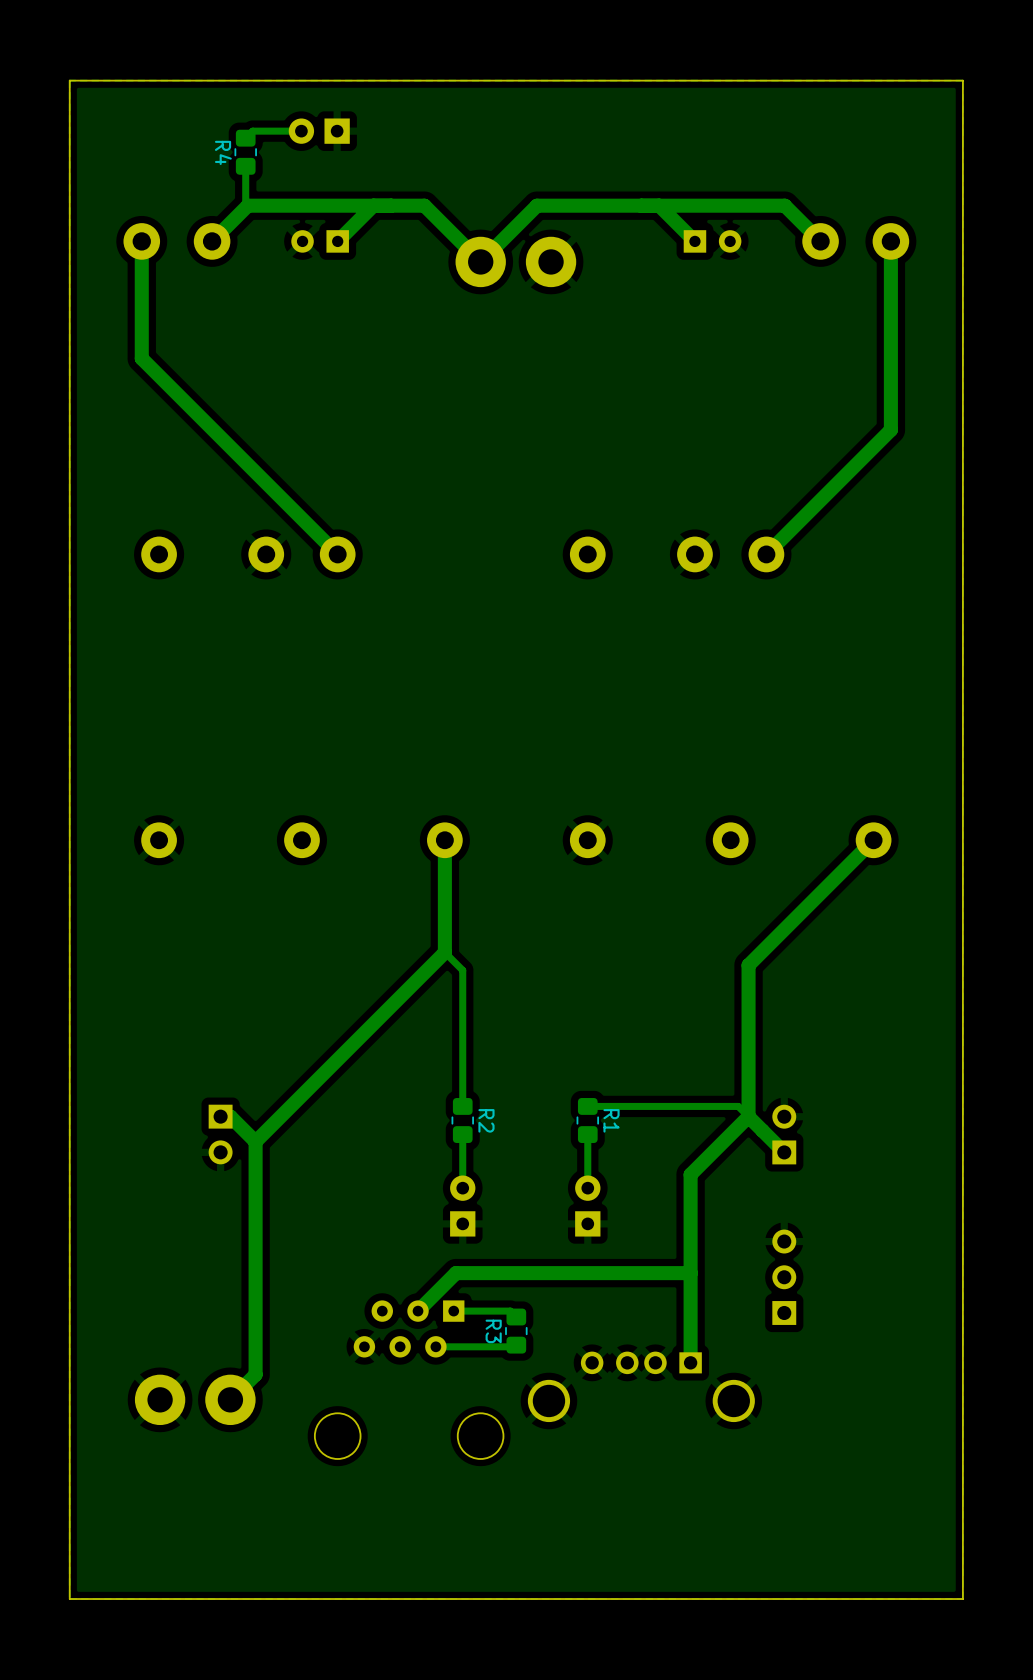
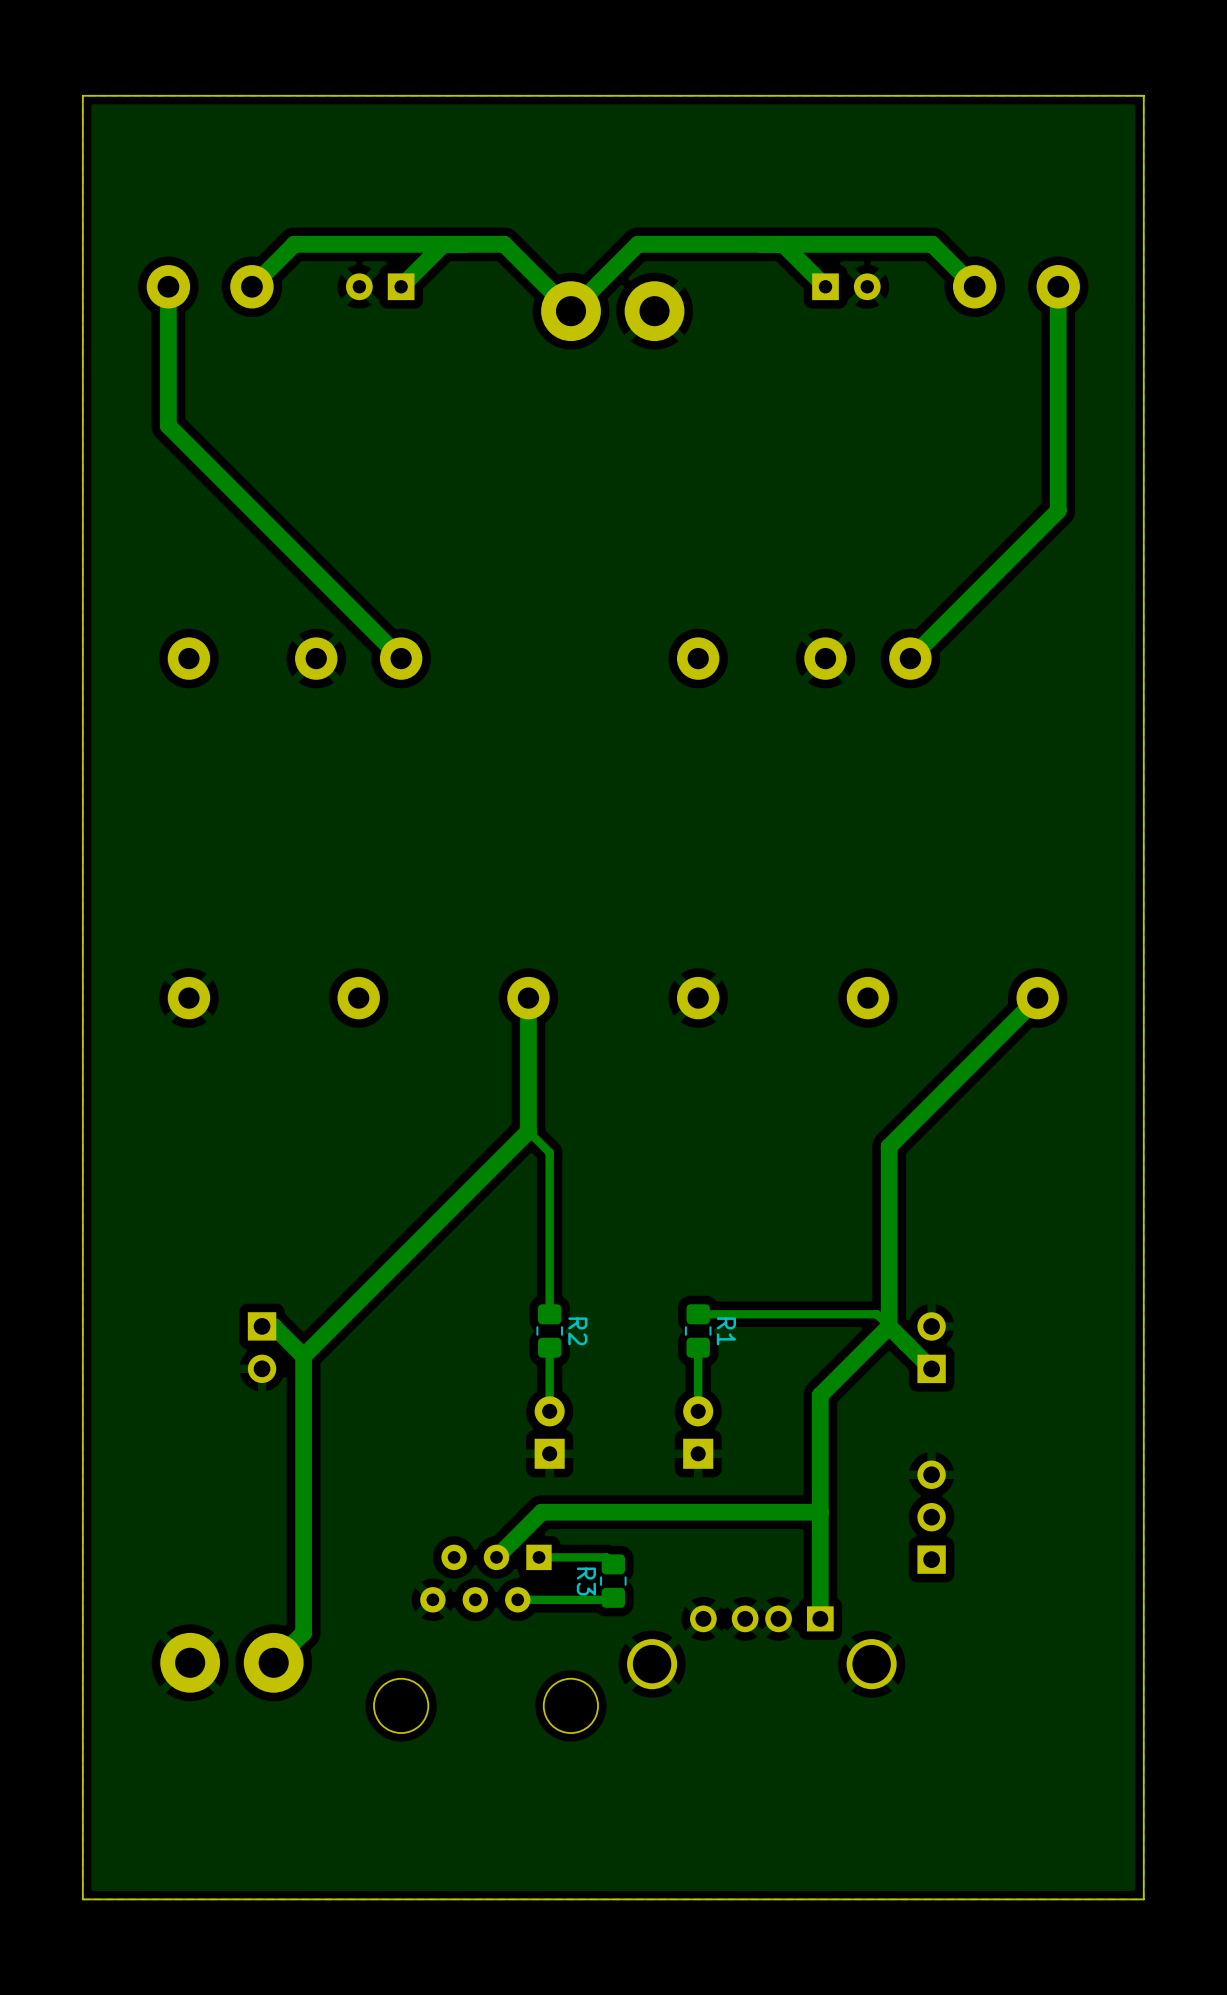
track: (301, 131) (252, 131) (245, 138) -> none
part: (319, 131) -> none
R4: (245, 152) -> none
track: (245, 166) (245, 203) (247, 205) -> none

